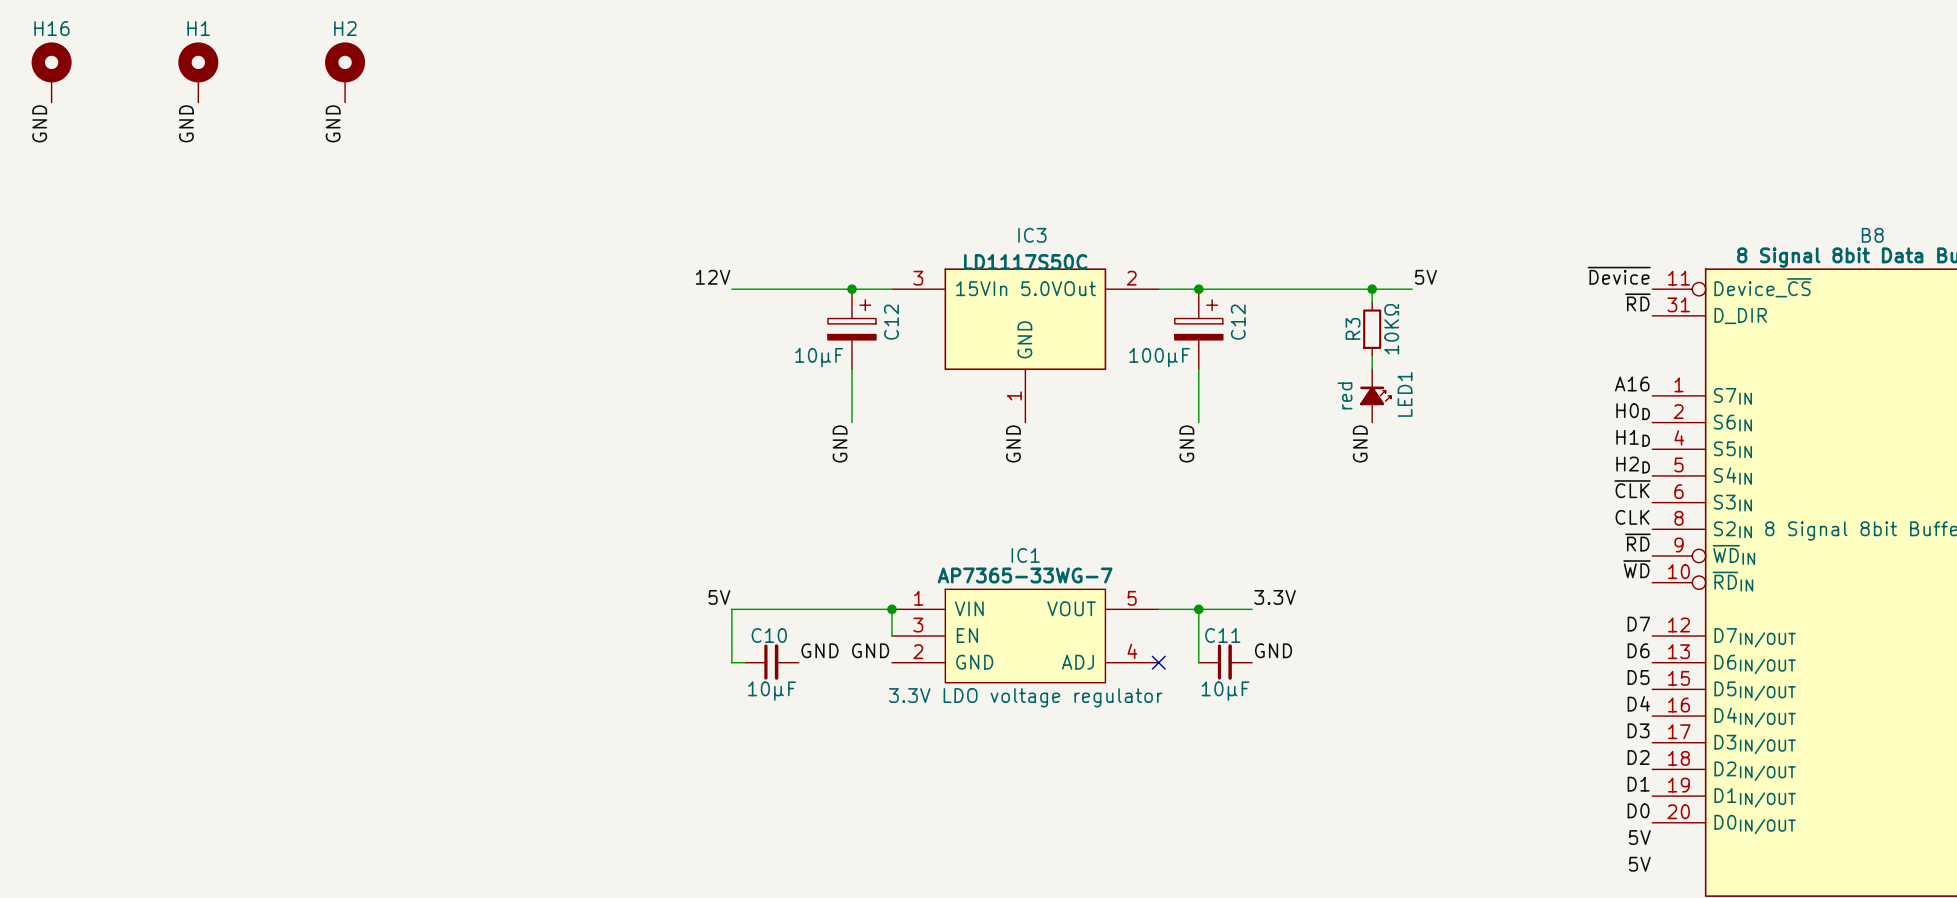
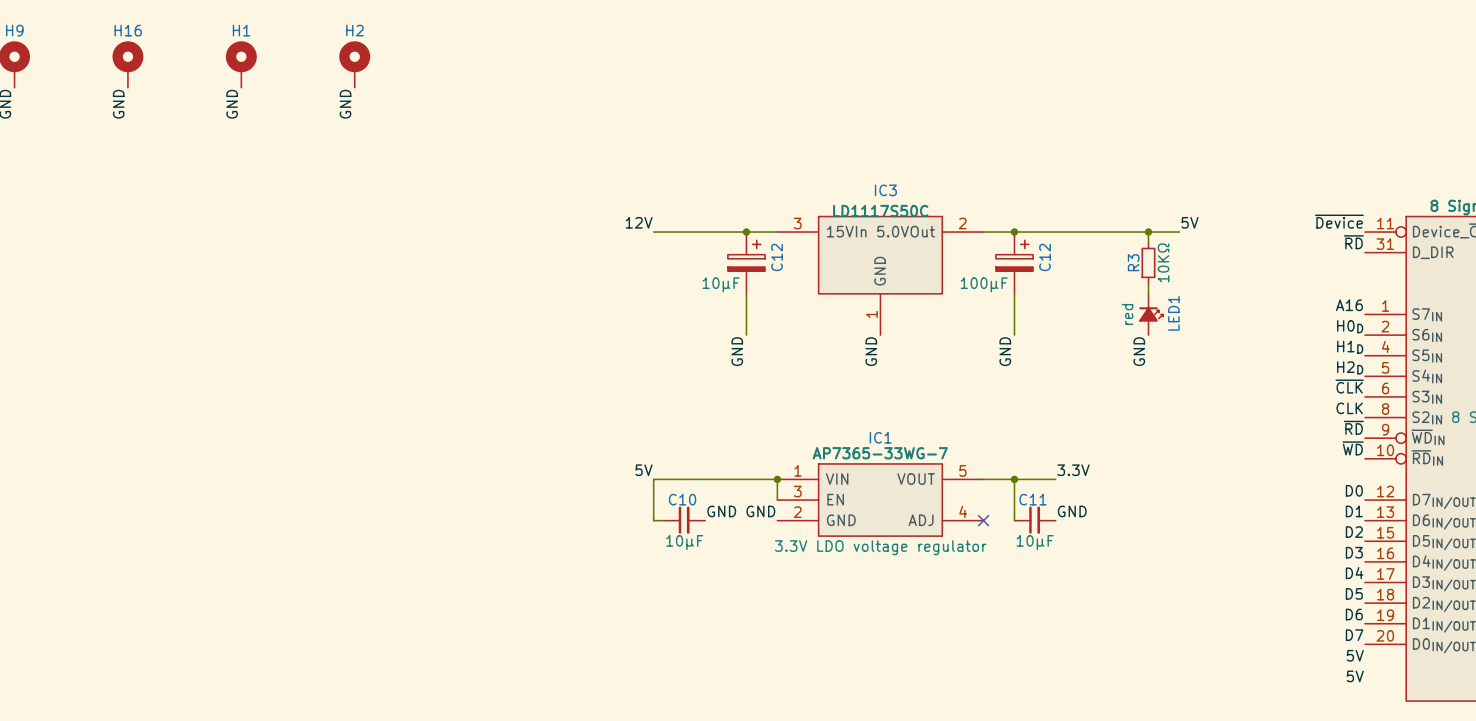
label: D7 (1638, 624) -> D0 (1354, 490)
label: D6 (1638, 650) -> D1 (1354, 511)
label: D5 (1638, 677) -> D2 (1354, 532)
label: D4 (1638, 703) -> D3 (1354, 552)
label: D3 (1638, 730) -> D4 (1354, 573)
label: D2 (1638, 757) -> D5 (1354, 593)
label: D1 (1638, 784) -> D6 (1354, 614)
label: D0 (1638, 810) -> D7 (1354, 635)

